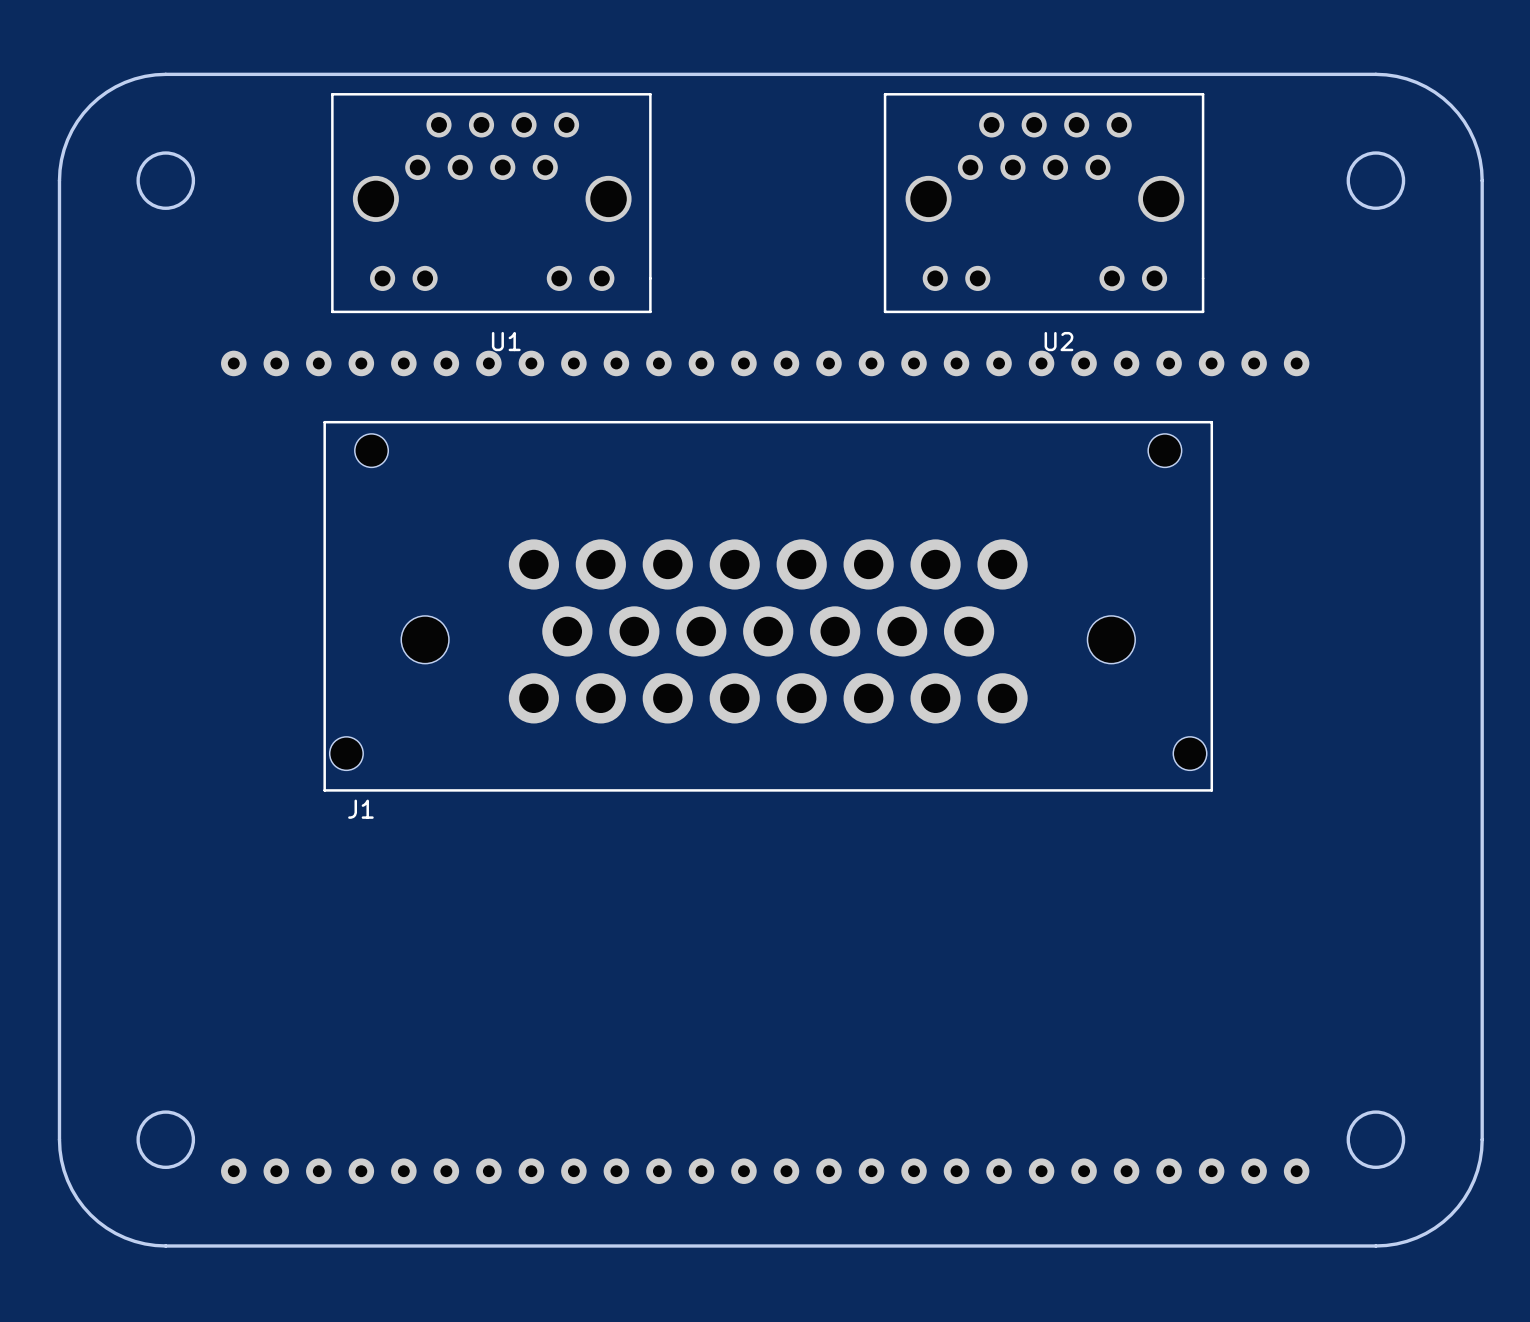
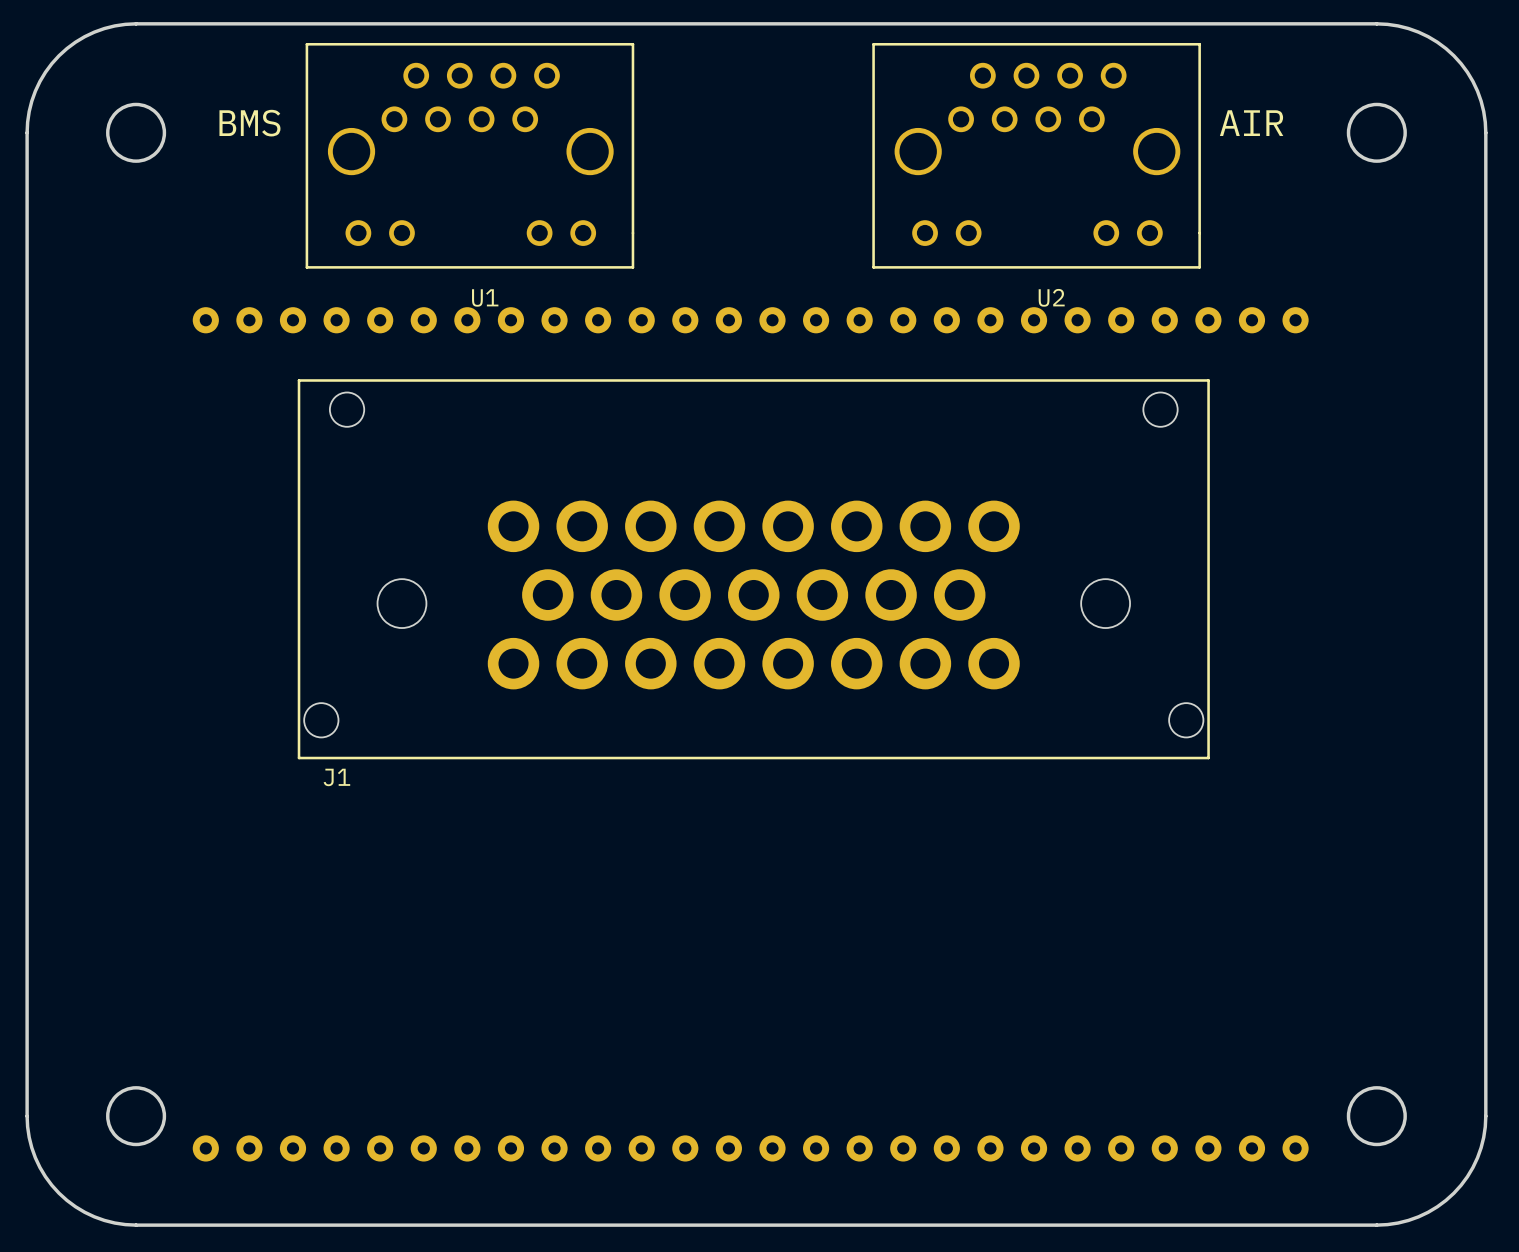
text: none -> BMS (249, 123)
text: none -> AIR (1251, 123)

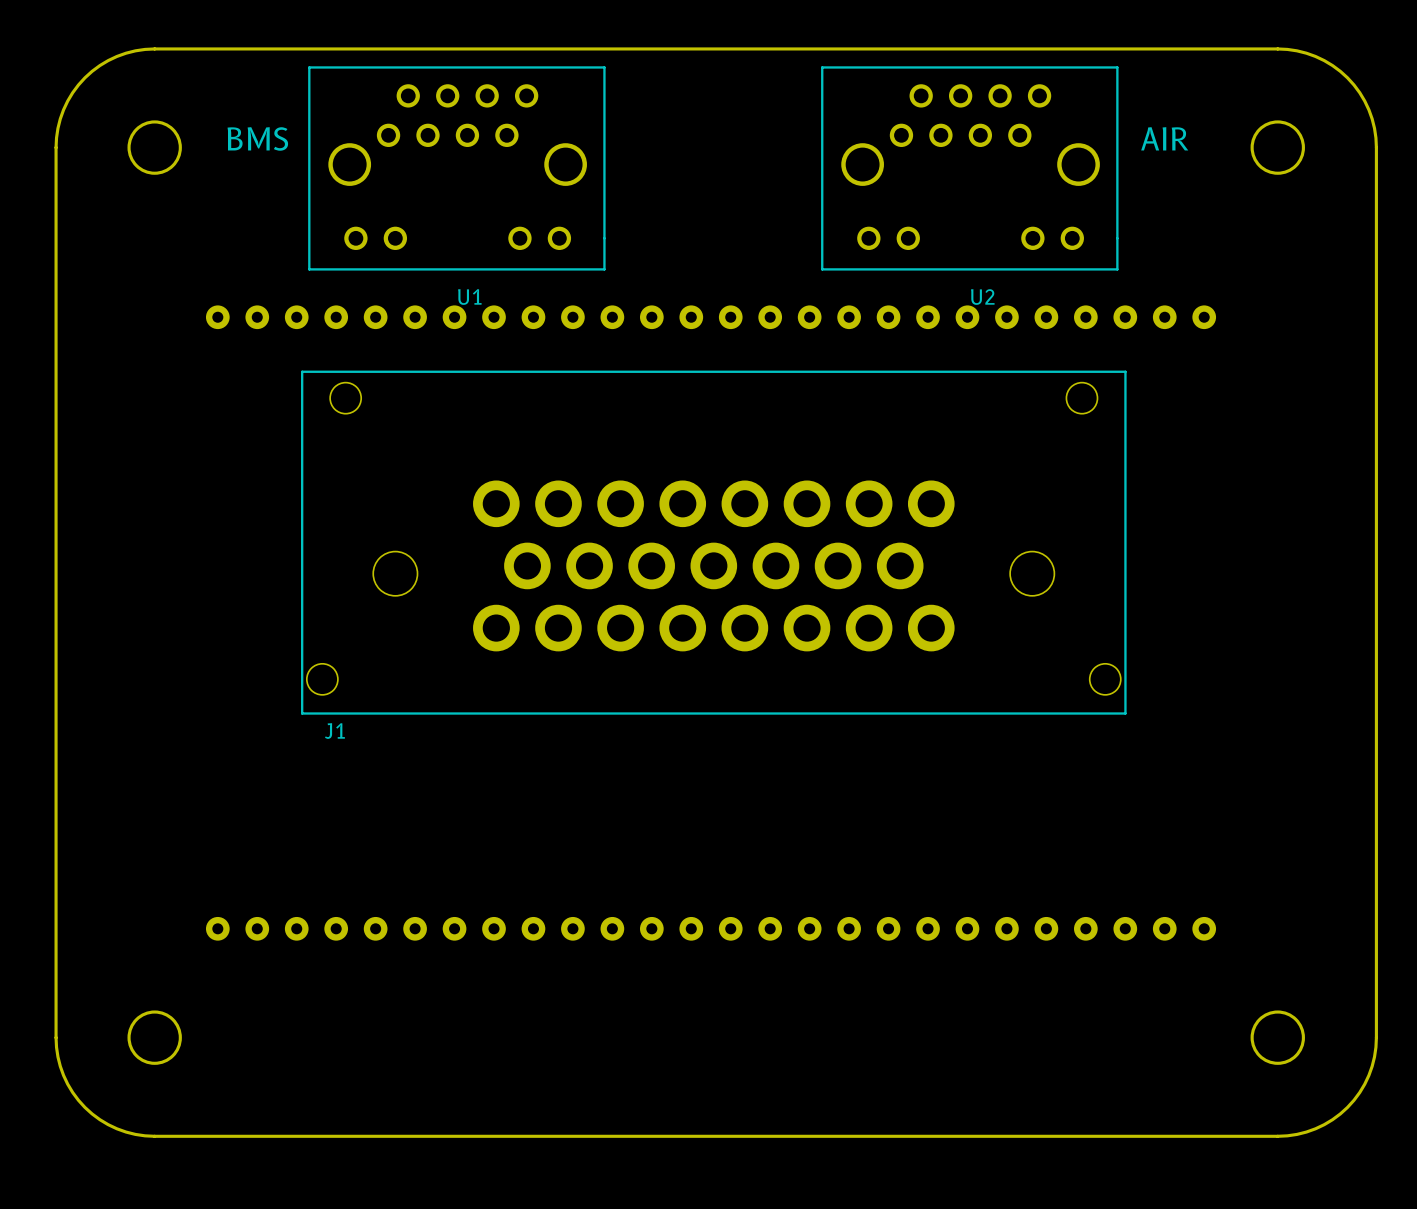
part position: (750, 1148) -> (711, 928)

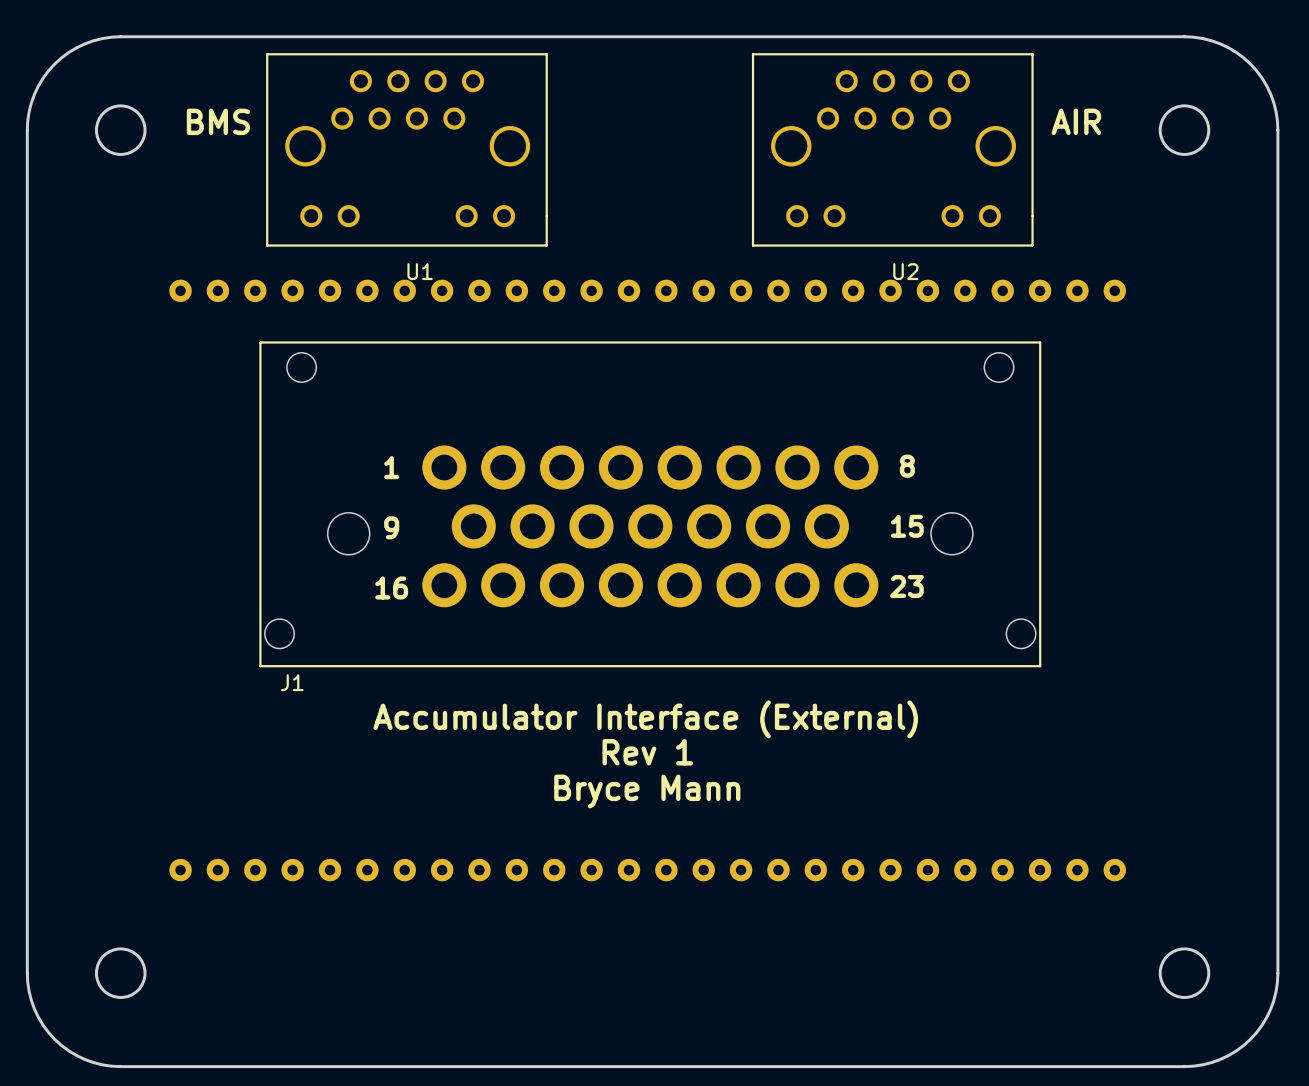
text: none -> 8 (907, 466)
text: none -> 1 (391, 467)
text: none -> 15 (907, 526)
text: none -> 9 (391, 527)
text: none -> 23 (906, 586)
text: none -> 16 (391, 587)
text: none -> Accumulator Interface (External) (645, 719)
text: none -> Rev 1 (647, 752)
text: none -> Bryce Mann (647, 791)

